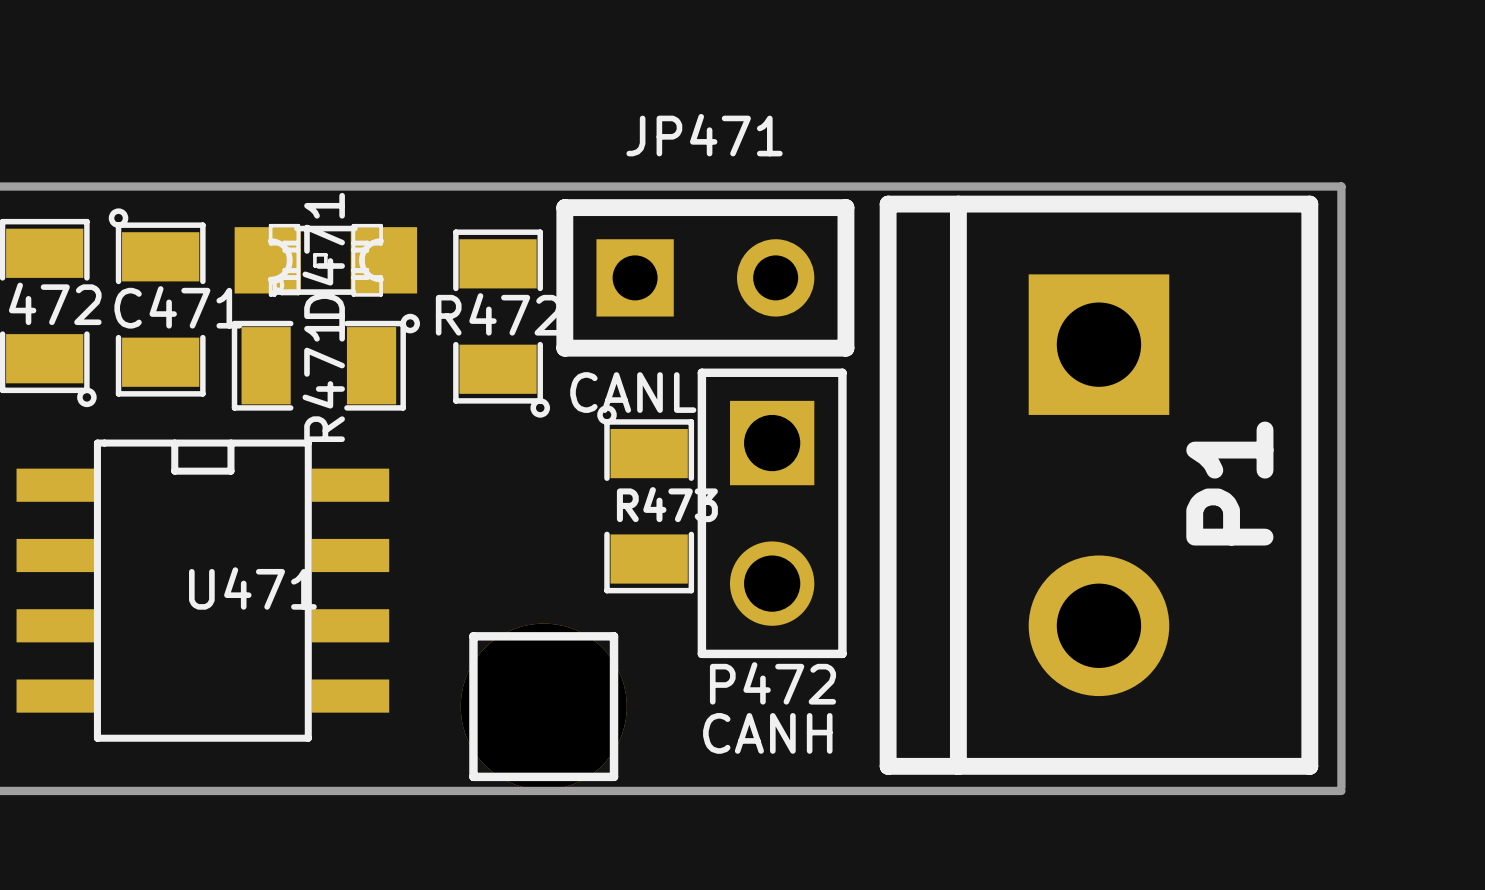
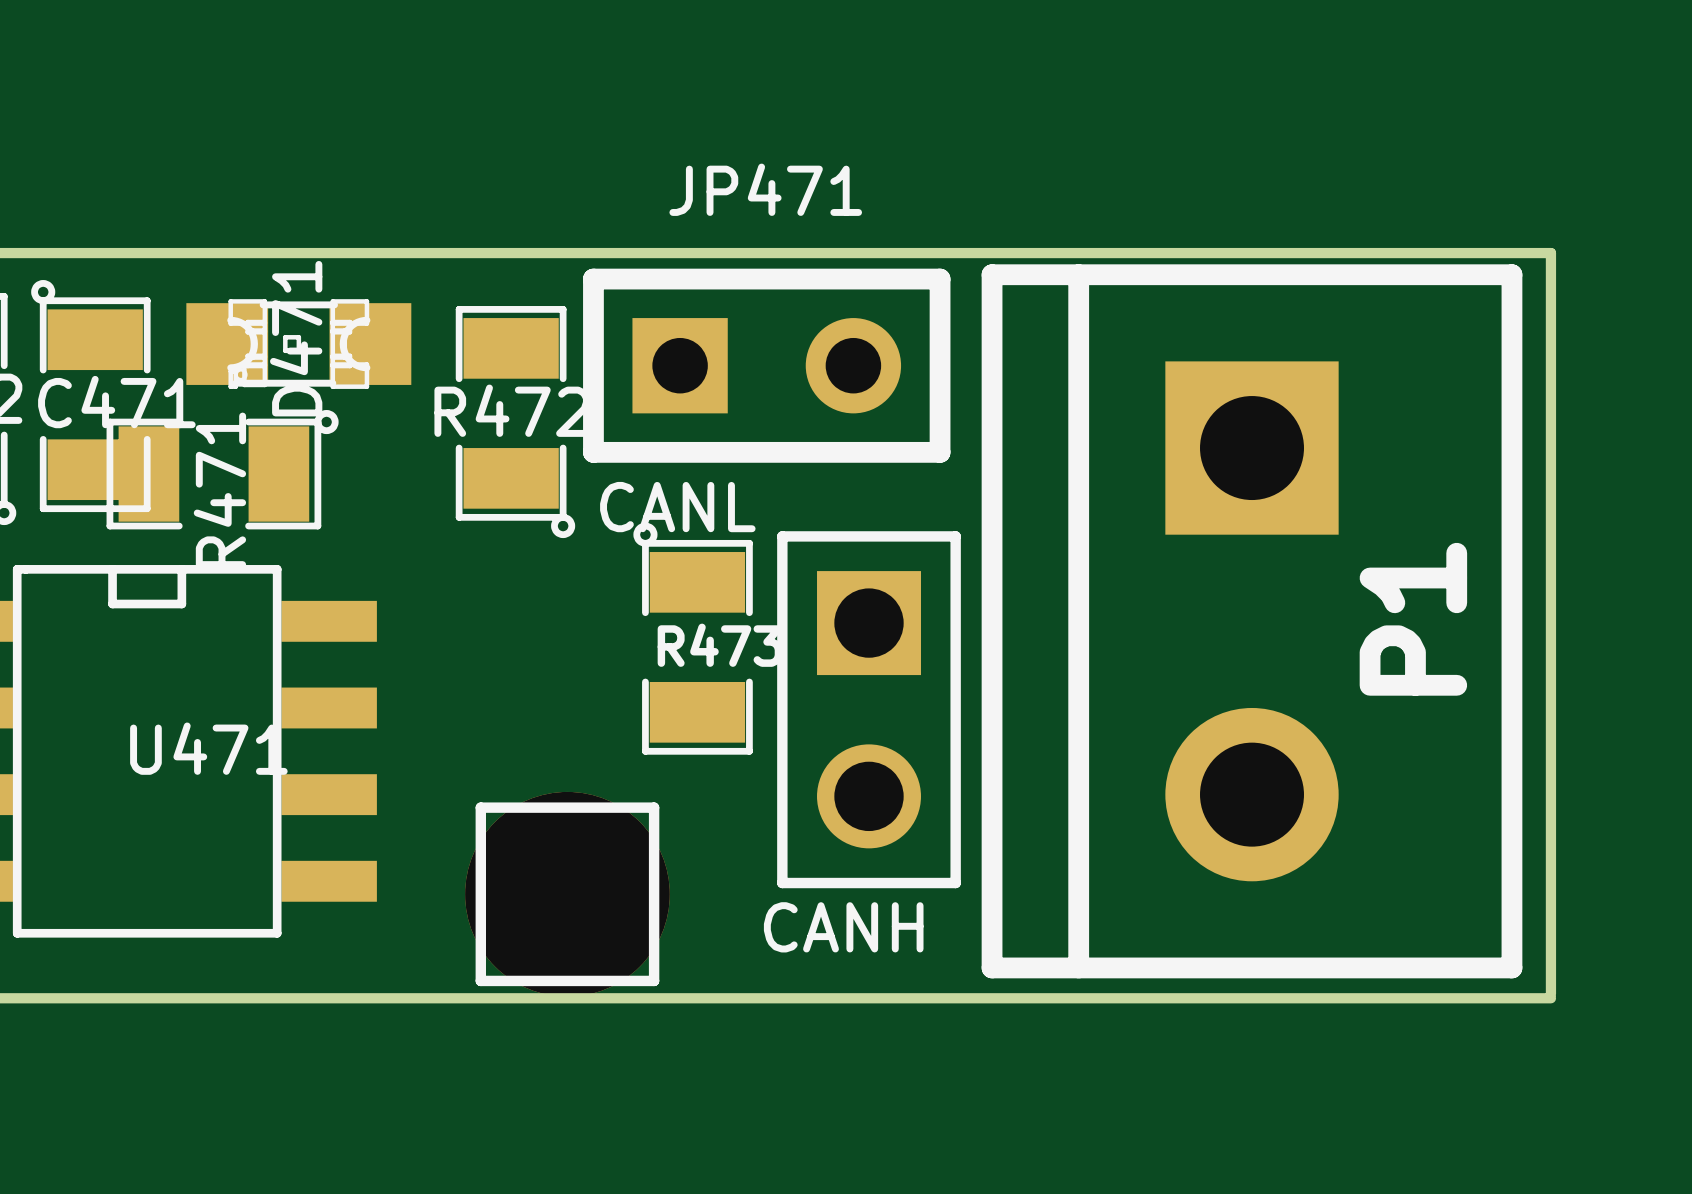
R471 position: (325, 362) -> (222, 469)
P472 position: (772, 513) -> (869, 709)
P472 name: P472 (772, 683) -> none

